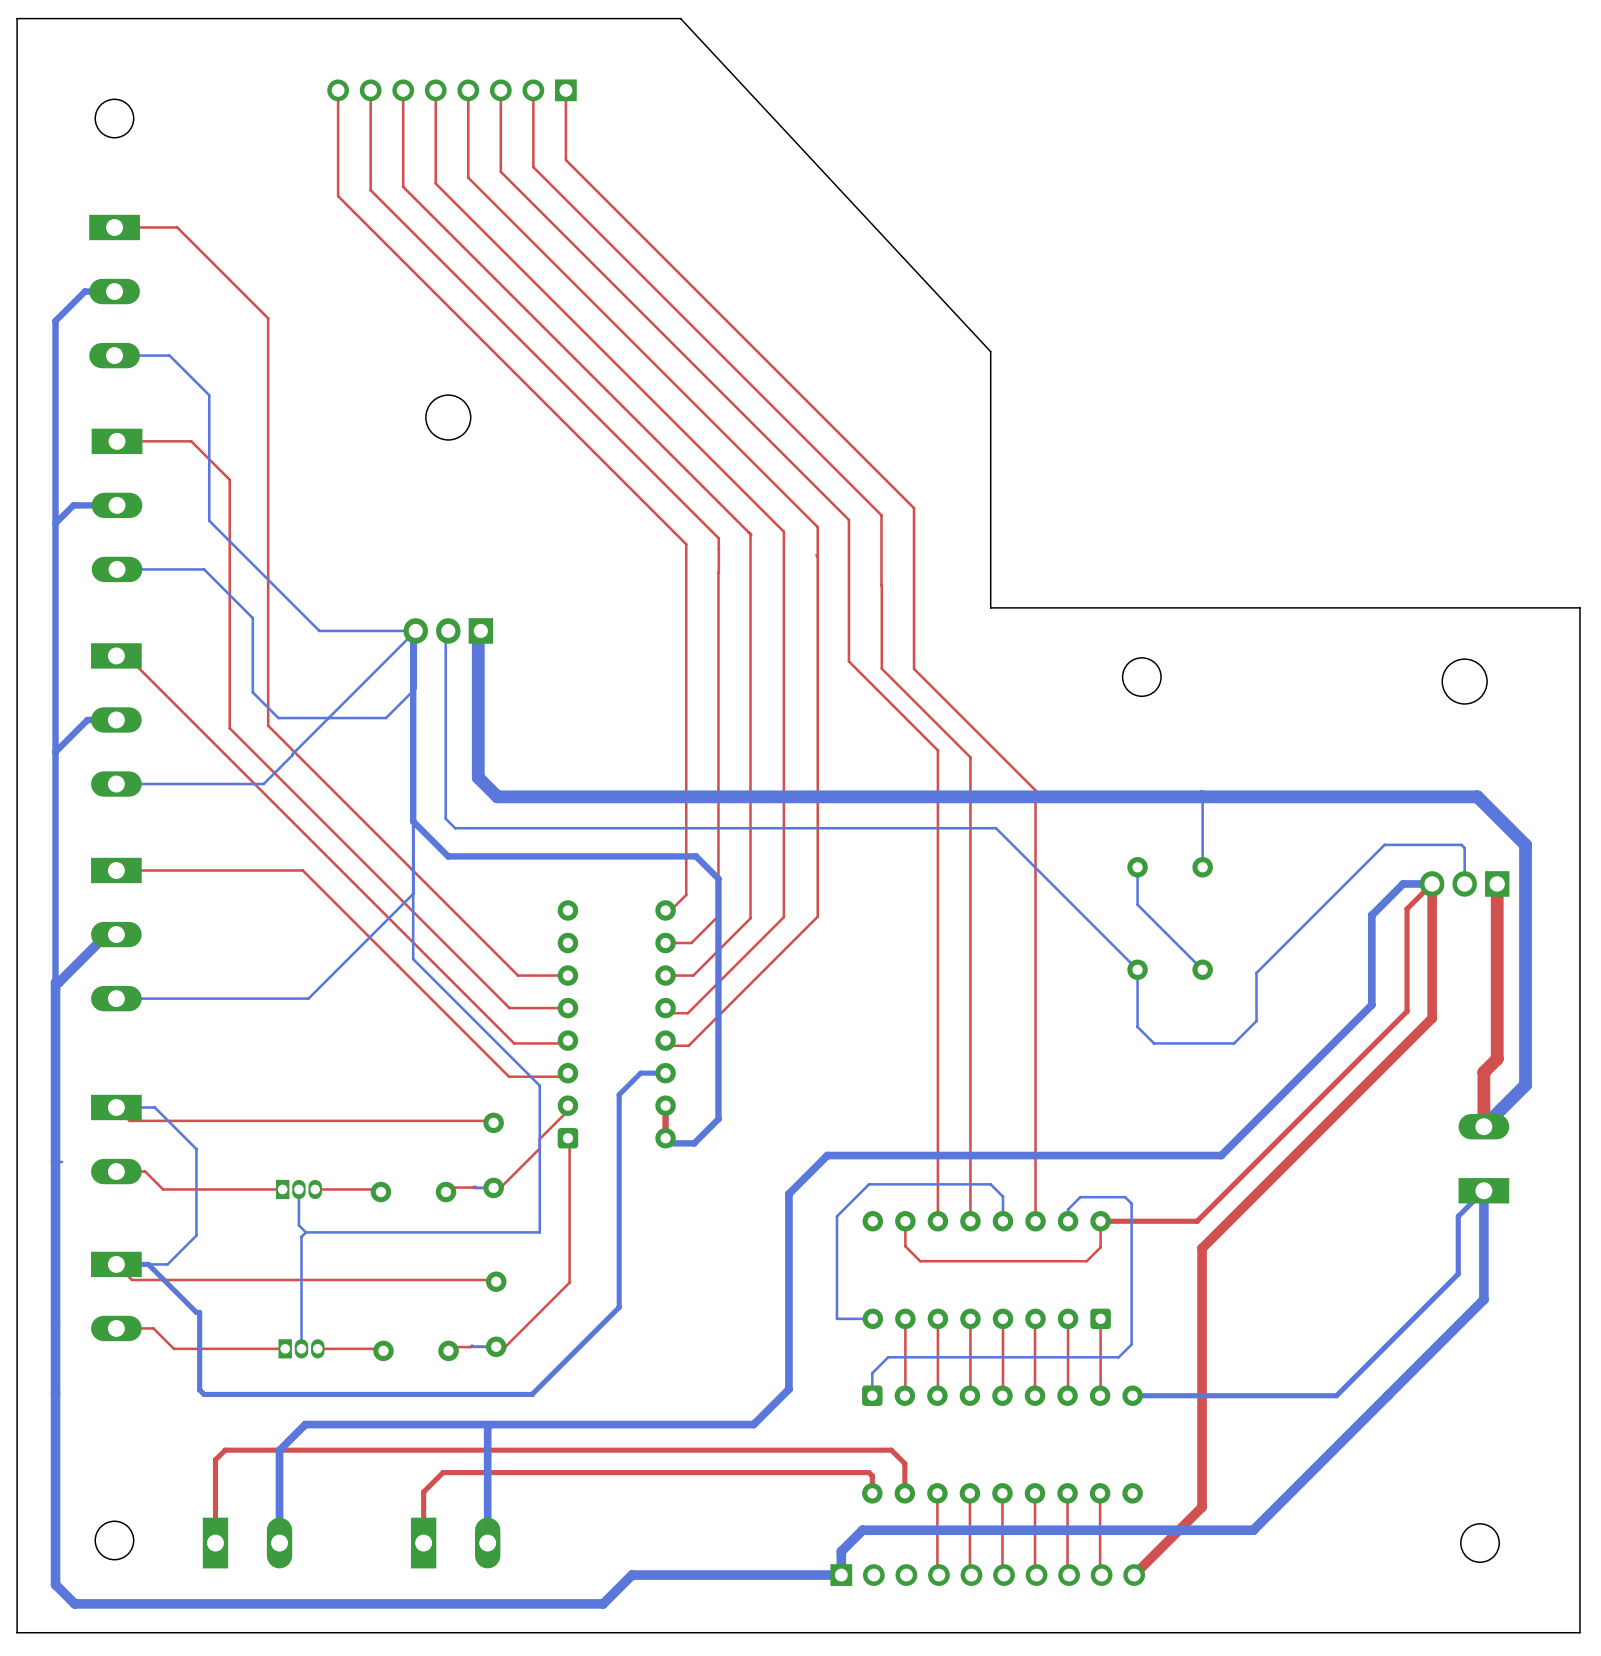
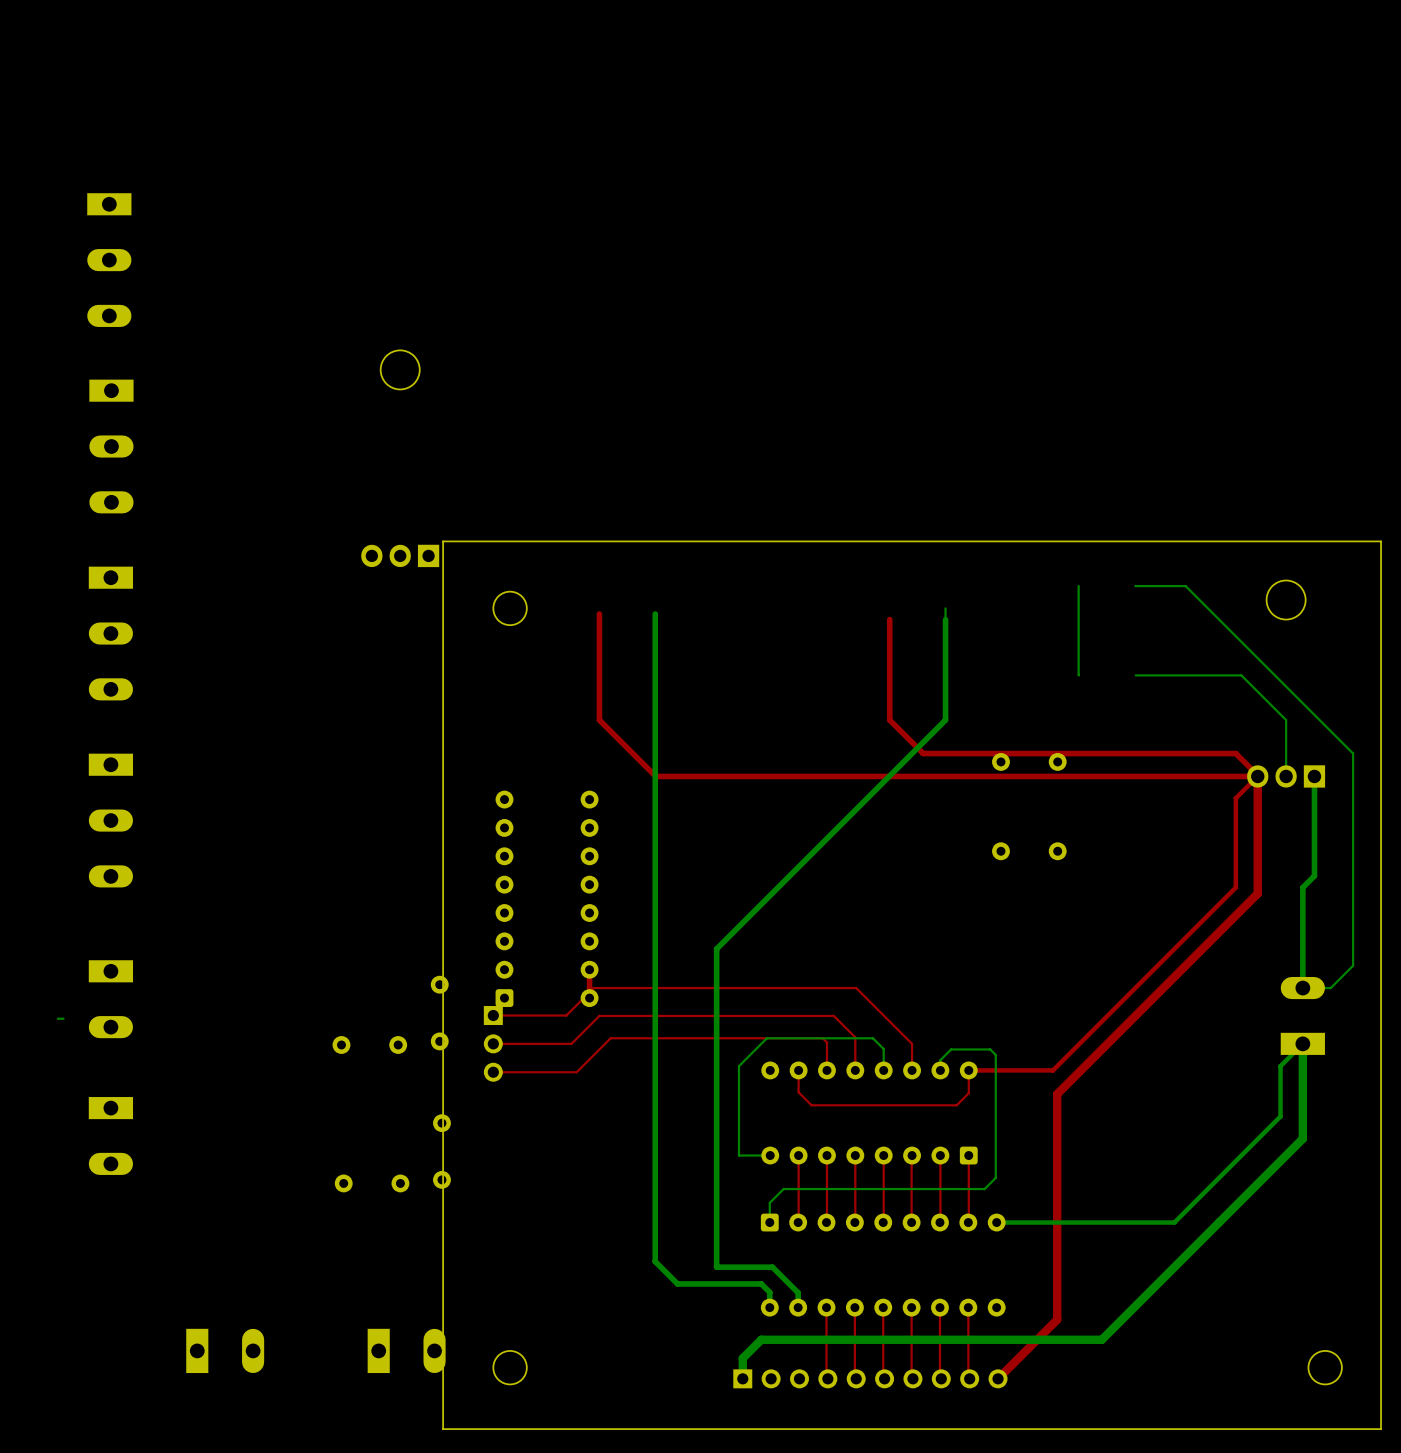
top track: (338, 90) (338, 196) (686, 544) (686, 894) (670, 910) (665, 910) -> none
top track: (370, 90) (370, 190) (718, 538) (718, 915) (691, 943) (665, 943) -> none
top track: (403, 90) (403, 186) (751, 535) -> none
top track: (435, 90) (435, 183) (783, 531) (783, 917) (687, 1013) (670, 1013) (665, 1008) -> none
part: (452, 90) -> none
top track: (468, 90) (468, 177) (817, 527) (817, 916) (688, 1045) (670, 1045) (665, 1040) -> none
top track: (500, 90) (500, 171) (848, 519) (848, 661) (937, 750) (937, 1189) -> (493, 1072) (576, 1072) (610, 1038) (822, 1038) (826, 1042)
top track: (533, 90) (533, 167) (881, 515) (881, 668) (970, 757) (970, 1183) -> (493, 1043) (571, 1043) (599, 1015) (833, 1015) (855, 1037)
top track: (565, 90) (565, 160) (914, 508) (914, 668) (1035, 790) (1035, 1190) -> (493, 1015) (566, 1015) (593, 988) (856, 988) (912, 1043)
round board edge: [94, 98, 134, 139] -> none
top track: (114, 227) (177, 227) (268, 318) (268, 725) (517, 975) (567, 975) -> none
bottom track: (114, 291) (84, 291) (55, 320) (55, 989) -> none
bottom track: (114, 355) (169, 355) (209, 395) (209, 520) (319, 630) (415, 630) -> none
top track: (117, 441) (191, 441) (229, 479) (229, 728) (509, 1008) (567, 1008) -> none
bottom track: (117, 505) (73, 505) (55, 523) -> none
top track: (750, 534) (750, 918) (693, 975) (665, 975) -> none
top track: (816, 555) (817, 556) -> none
bottom track: (117, 569) (204, 569) (252, 618) (252, 692) (278, 718) (386, 718) (415, 688) (415, 630) -> none
bottom track: (415, 630) (263, 784) (116, 784) -> none
bottom track: (448, 630) (445, 633) (445, 818) (455, 828) (996, 828) (1137, 969) (1137, 1026) (1154, 1043) (1234, 1043) (1256, 1021) (1256, 972) (1384, 844) (1461, 844) (1464, 848) -> (1135, 675) (1241, 675) (1286, 720) (1286, 745)
bottom track: (480, 630) (478, 633) (478, 777) (497, 796) (1477, 796) (1525, 844) (1525, 1085) (1483, 1126) -> none
bottom track: (413, 633) (413, 821) (448, 856) (696, 856) (718, 878) (718, 1119) (694, 1143) (670, 1143) (665, 1138) -> none
bottom track: (413, 633) (413, 959) (539, 1085) (539, 1232) (305, 1232) -> none
top track: (116, 655) (126, 655) (514, 1043) (565, 1043) (567, 1045) (567, 1040) -> none
round board edge: [1122, 657, 1162, 697] -> none
bottom track: none -> (1078, 586) (1079, 675)
bottom track: none -> (1135, 586) (1185, 586) (1353, 753) (1353, 965) (1330, 988) (1302, 988) (1302, 887) (1314, 875) (1314, 776)
round board edge: none -> [493, 591, 528, 626]
bottom track: none -> (945, 608) (945, 720) (716, 948) (716, 1267) (772, 1267) (798, 1292) (798, 1307)
top track: none -> (599, 613) (599, 720) (655, 776) (1257, 776)
bottom track: none -> (655, 613) (655, 1261) (677, 1283) (761, 1283) (769, 1292) (769, 1307)
top track: none -> (889, 619) (889, 720) (923, 753) (1235, 753) (1257, 775)
bottom track: (116, 719) (87, 719) (55, 752) -> none
bottom track: (1202, 796) (1203, 867) -> none
bottom track: (1137, 867) (1137, 904) (1202, 969) -> none
top track: (116, 870) (302, 870) (509, 1076) (564, 1076) (567, 1073) -> none
bottom track: (1432, 883) (1403, 883) (1371, 915) (1371, 1005) (1221, 1155) (827, 1155) (788, 1193) (788, 1389) (753, 1424) (305, 1424) (279, 1450) (279, 1543) -> none
top track: (1497, 883) (1497, 1058) (1483, 1072) (1483, 1126) -> none
bottom track: (413, 893) (308, 998) (116, 998) -> none
bottom track: (116, 934) (106, 934) (58, 982) (55, 982) (55, 1584) (74, 1603) (603, 1603) (632, 1575) (841, 1575) -> none
bottom track: (665, 1073) (640, 1073) (619, 1094) (619, 1307) (532, 1394) (204, 1394) (199, 1389) (199, 1312) (196, 1312) (148, 1264) (116, 1264) (167, 1264) (196, 1235) (196, 1149) (154, 1107) (116, 1107) -> none
top track: (567, 1105) (567, 1110) (539, 1139) (539, 1148) (502, 1185) (493, 1187) (450, 1187) (445, 1192) -> none
top track: (116, 1107) (129, 1120) (491, 1120) (493, 1122) -> none
top track: (567, 1138) (569, 1145) (569, 1282) (505, 1346) (452, 1347) (448, 1350) -> none
top track: (116, 1171) (145, 1171) (163, 1189) (282, 1189) -> none
bottom track: (474, 1186) (493, 1187) -> none
bottom track: (298, 1189) (298, 1225) (305, 1232) -> none
part: (298, 1189) -> none
top track: (315, 1189) (378, 1189) (380, 1192) -> none
part: none -> (493, 1043)
bottom track: (305, 1232) (301, 1236) (301, 1348) -> none
top track: (116, 1264) (131, 1279) (494, 1279) (496, 1281) -> none
top track: (116, 1328) (153, 1328) (173, 1348) (285, 1348) -> none
bottom track: (472, 1345) (496, 1346) -> none
part: (301, 1348) -> none
top track: (317, 1348) (381, 1348) (383, 1350) -> none
bottom track: (487, 1424) (487, 1543) -> none
top track: (872, 1493) (872, 1475) (868, 1472) (443, 1472) (423, 1492) (423, 1543) -> none
top track: (904, 1493) (904, 1463) (891, 1450) (225, 1450) (215, 1459) (215, 1543) -> none
round board edge: [94, 1520, 134, 1561] -> none
round board edge: none -> [493, 1350, 528, 1385]
round board edge position: (1480, 1543) -> (1325, 1367)
board edge: (1573, 1632) (1579, 1632) (1579, 607) (990, 607) (990, 351) (680, 18) (17, 18) (17, 1632) (497, 1632) -> (1381, 1429) (1381, 541) (443, 541) (443, 1429)

